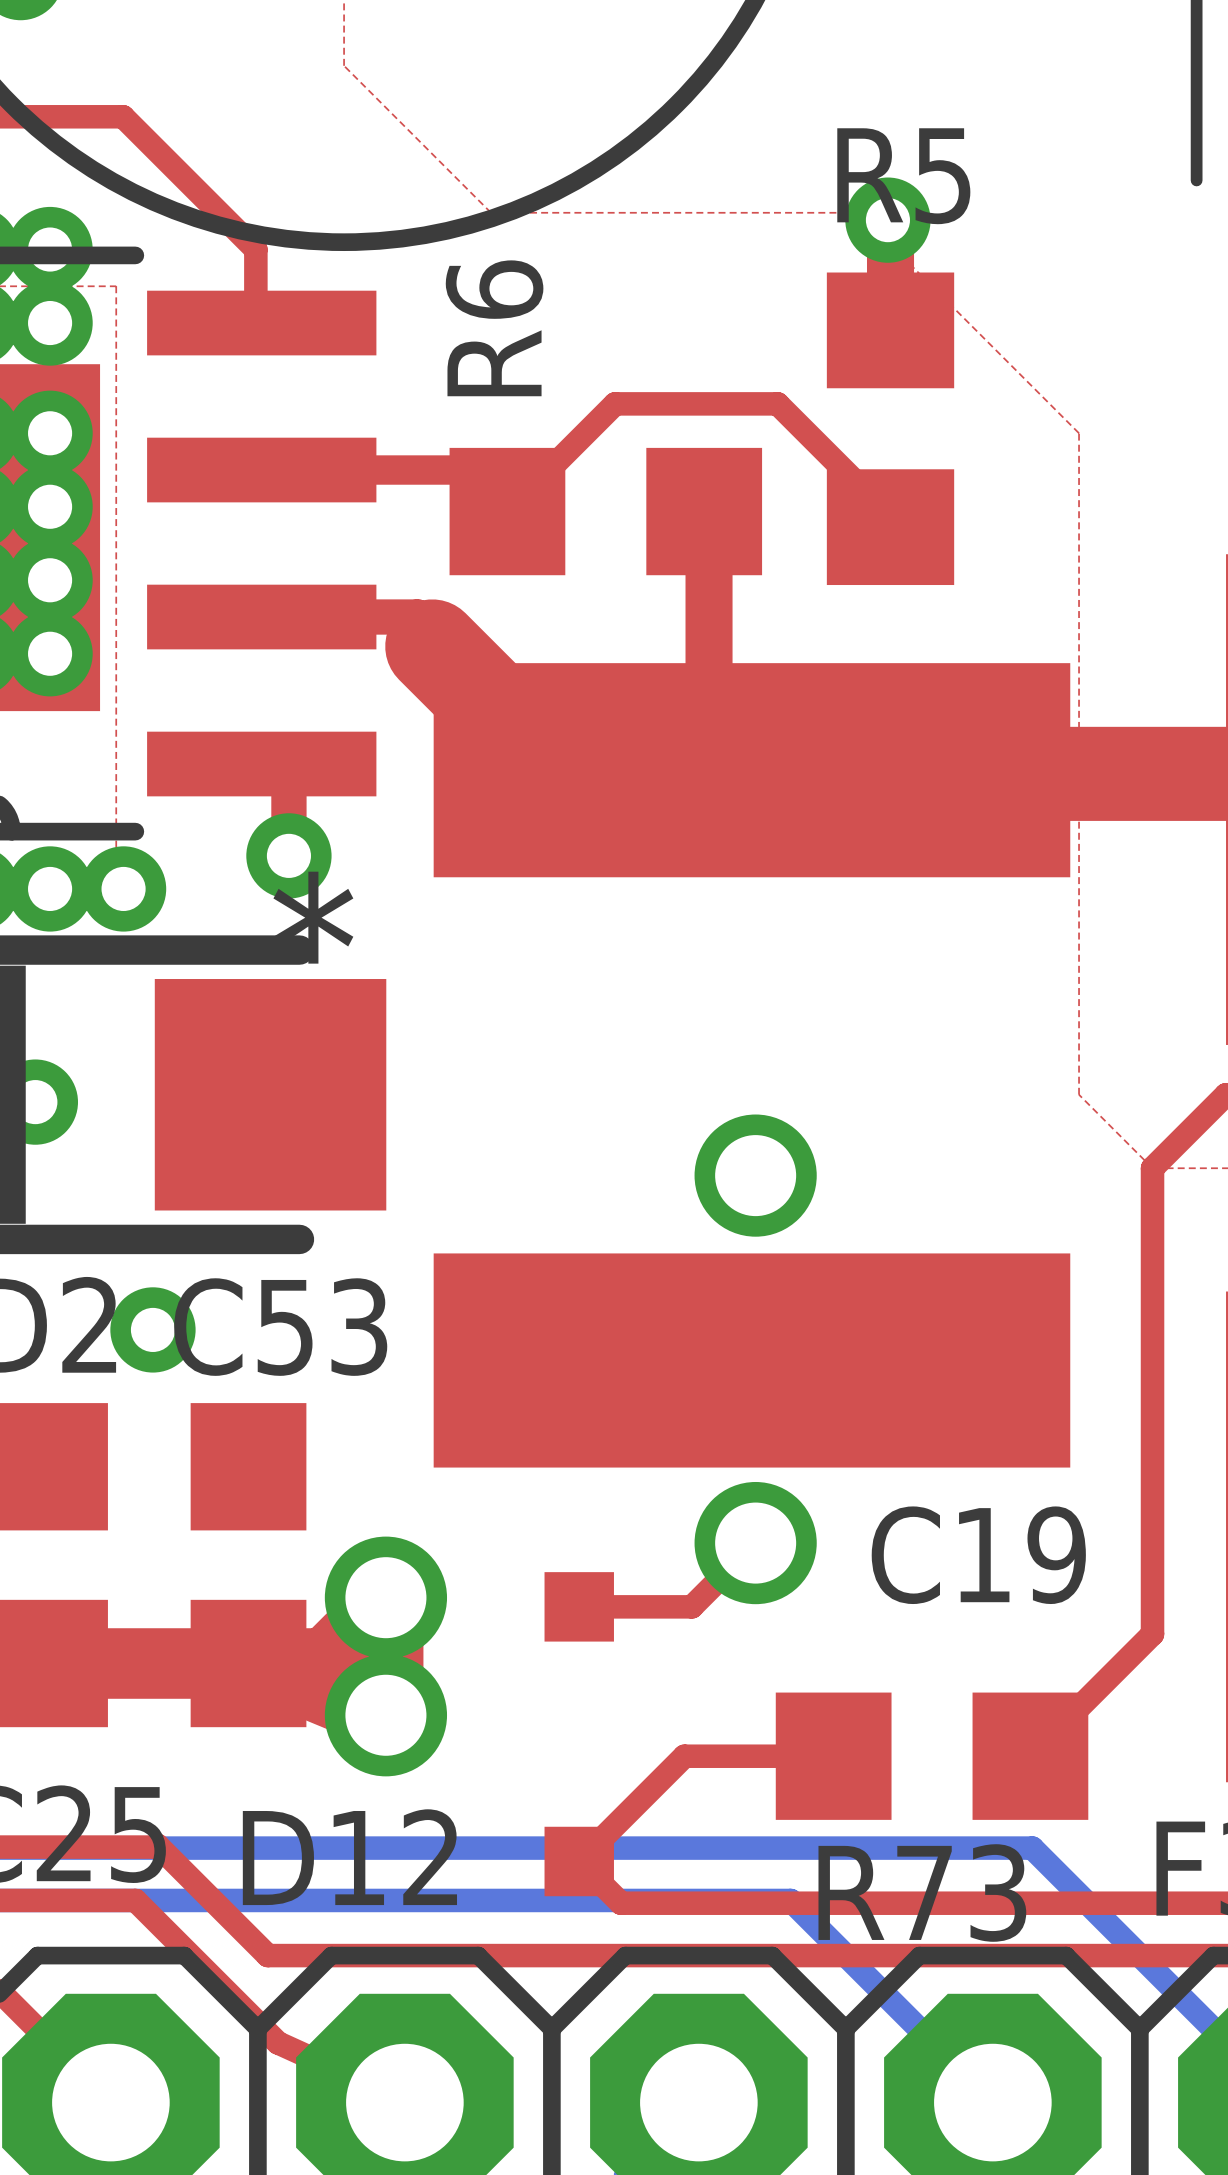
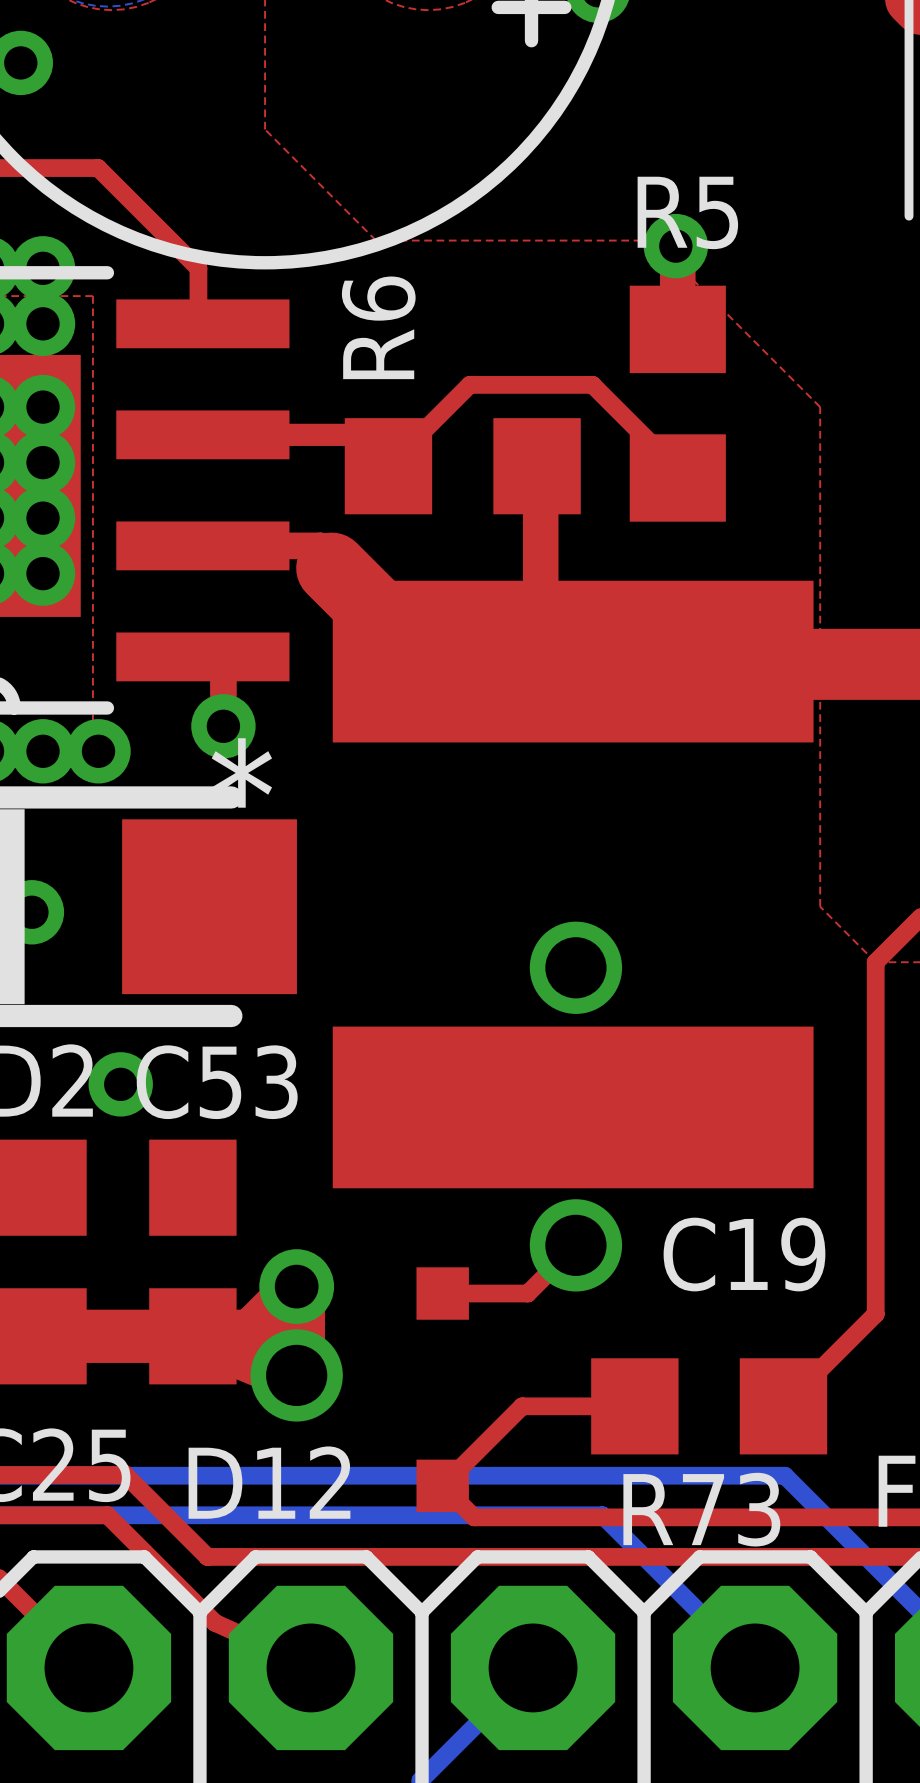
via size: [324, 1536, 448, 1659] -> [259, 1249, 335, 1324]

